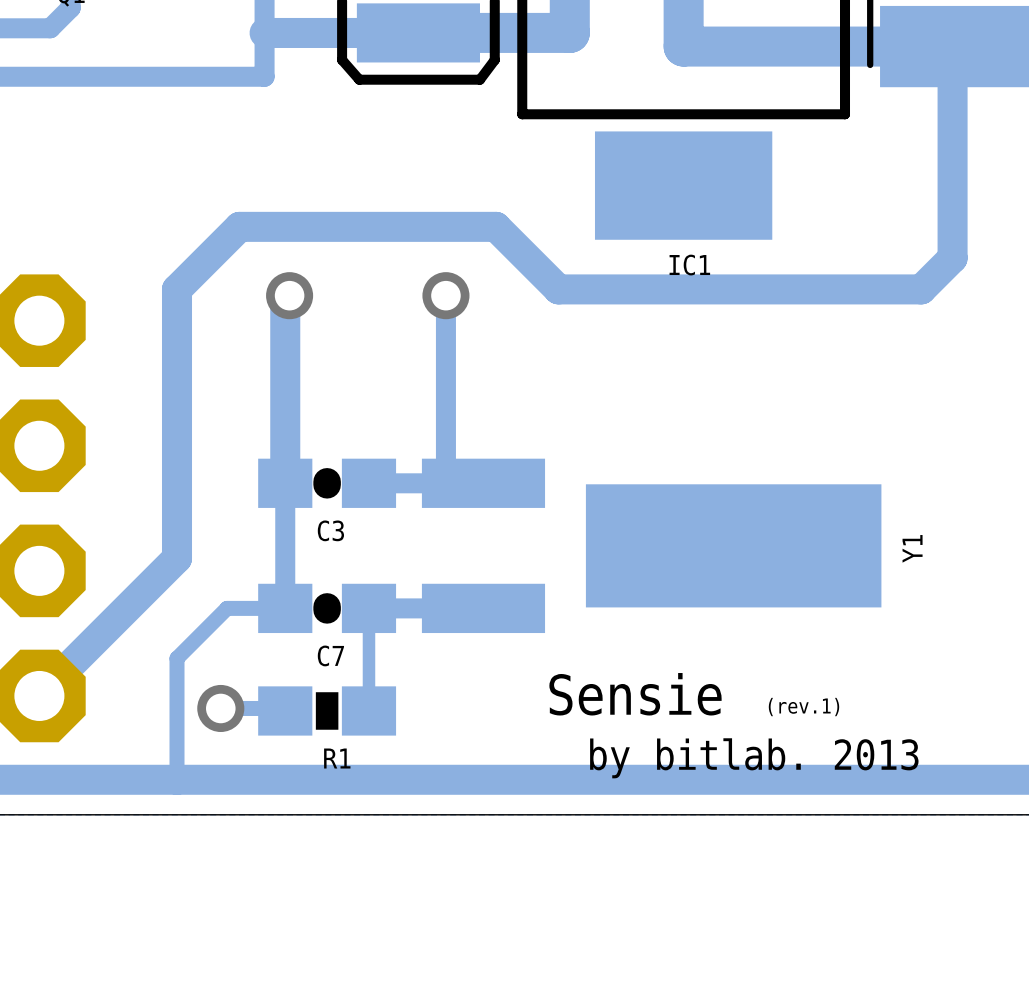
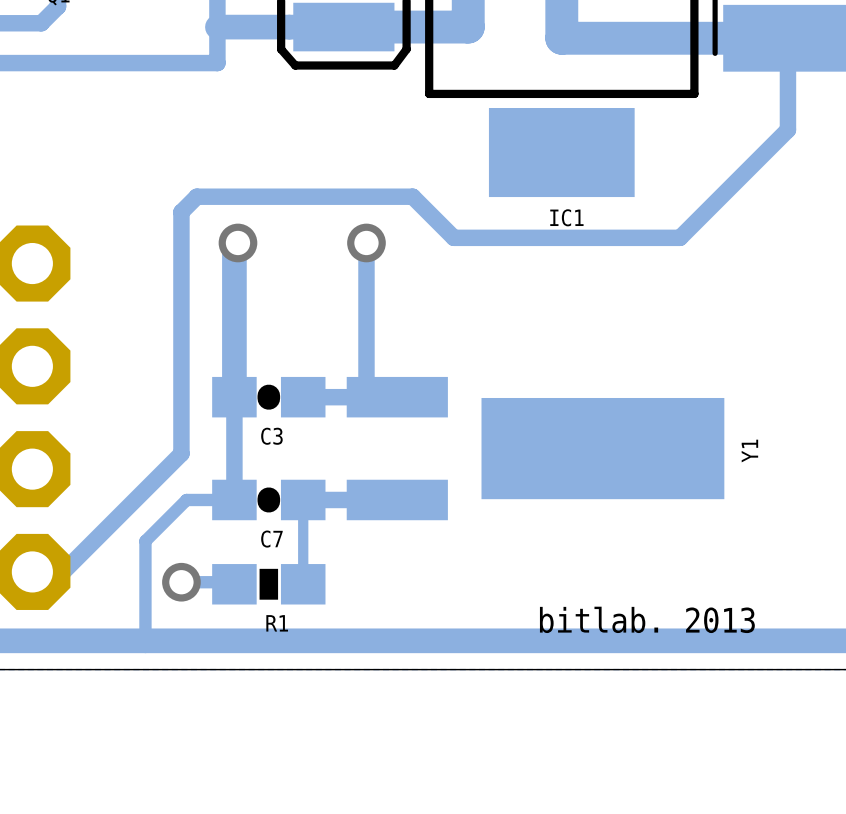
track: (683, 46) (934, 46) (952, 64) (952, 258) (921, 289) (827, 289) -> (787, 38) (787, 129) (680, 237)
track: (558, 289) (495, 226) (239, 226) (177, 289) (177, 558) (39, 695) -> (459, 237) (453, 237) (412, 196) (196, 196) (181, 212) (181, 453) (63, 571) (32, 571)
track width: thick (827, 289) (558, 289) -> thin (680, 237) (459, 237)
text: Sensie (635, 694) -> none
text: (rev.1) (803, 707) -> none
text: by bitlab. 2013 (754, 758) -> bitlab. 2013 (647, 619)

